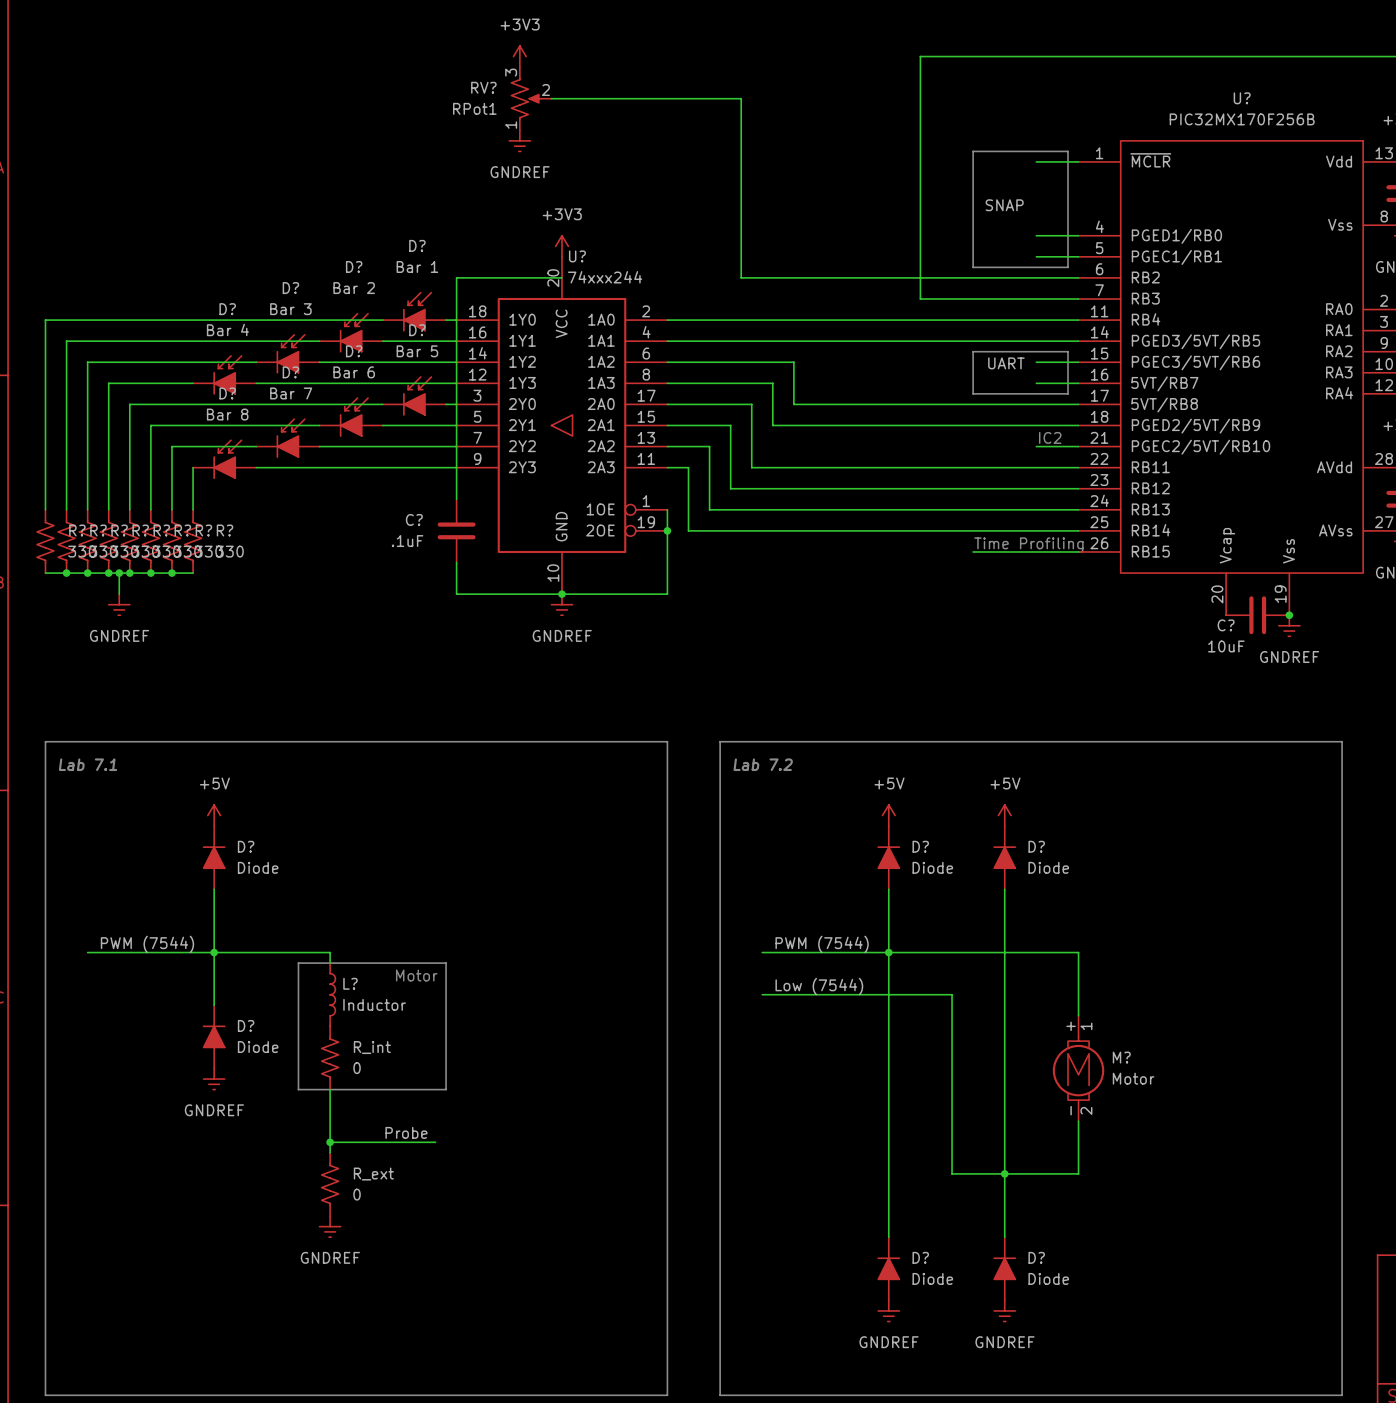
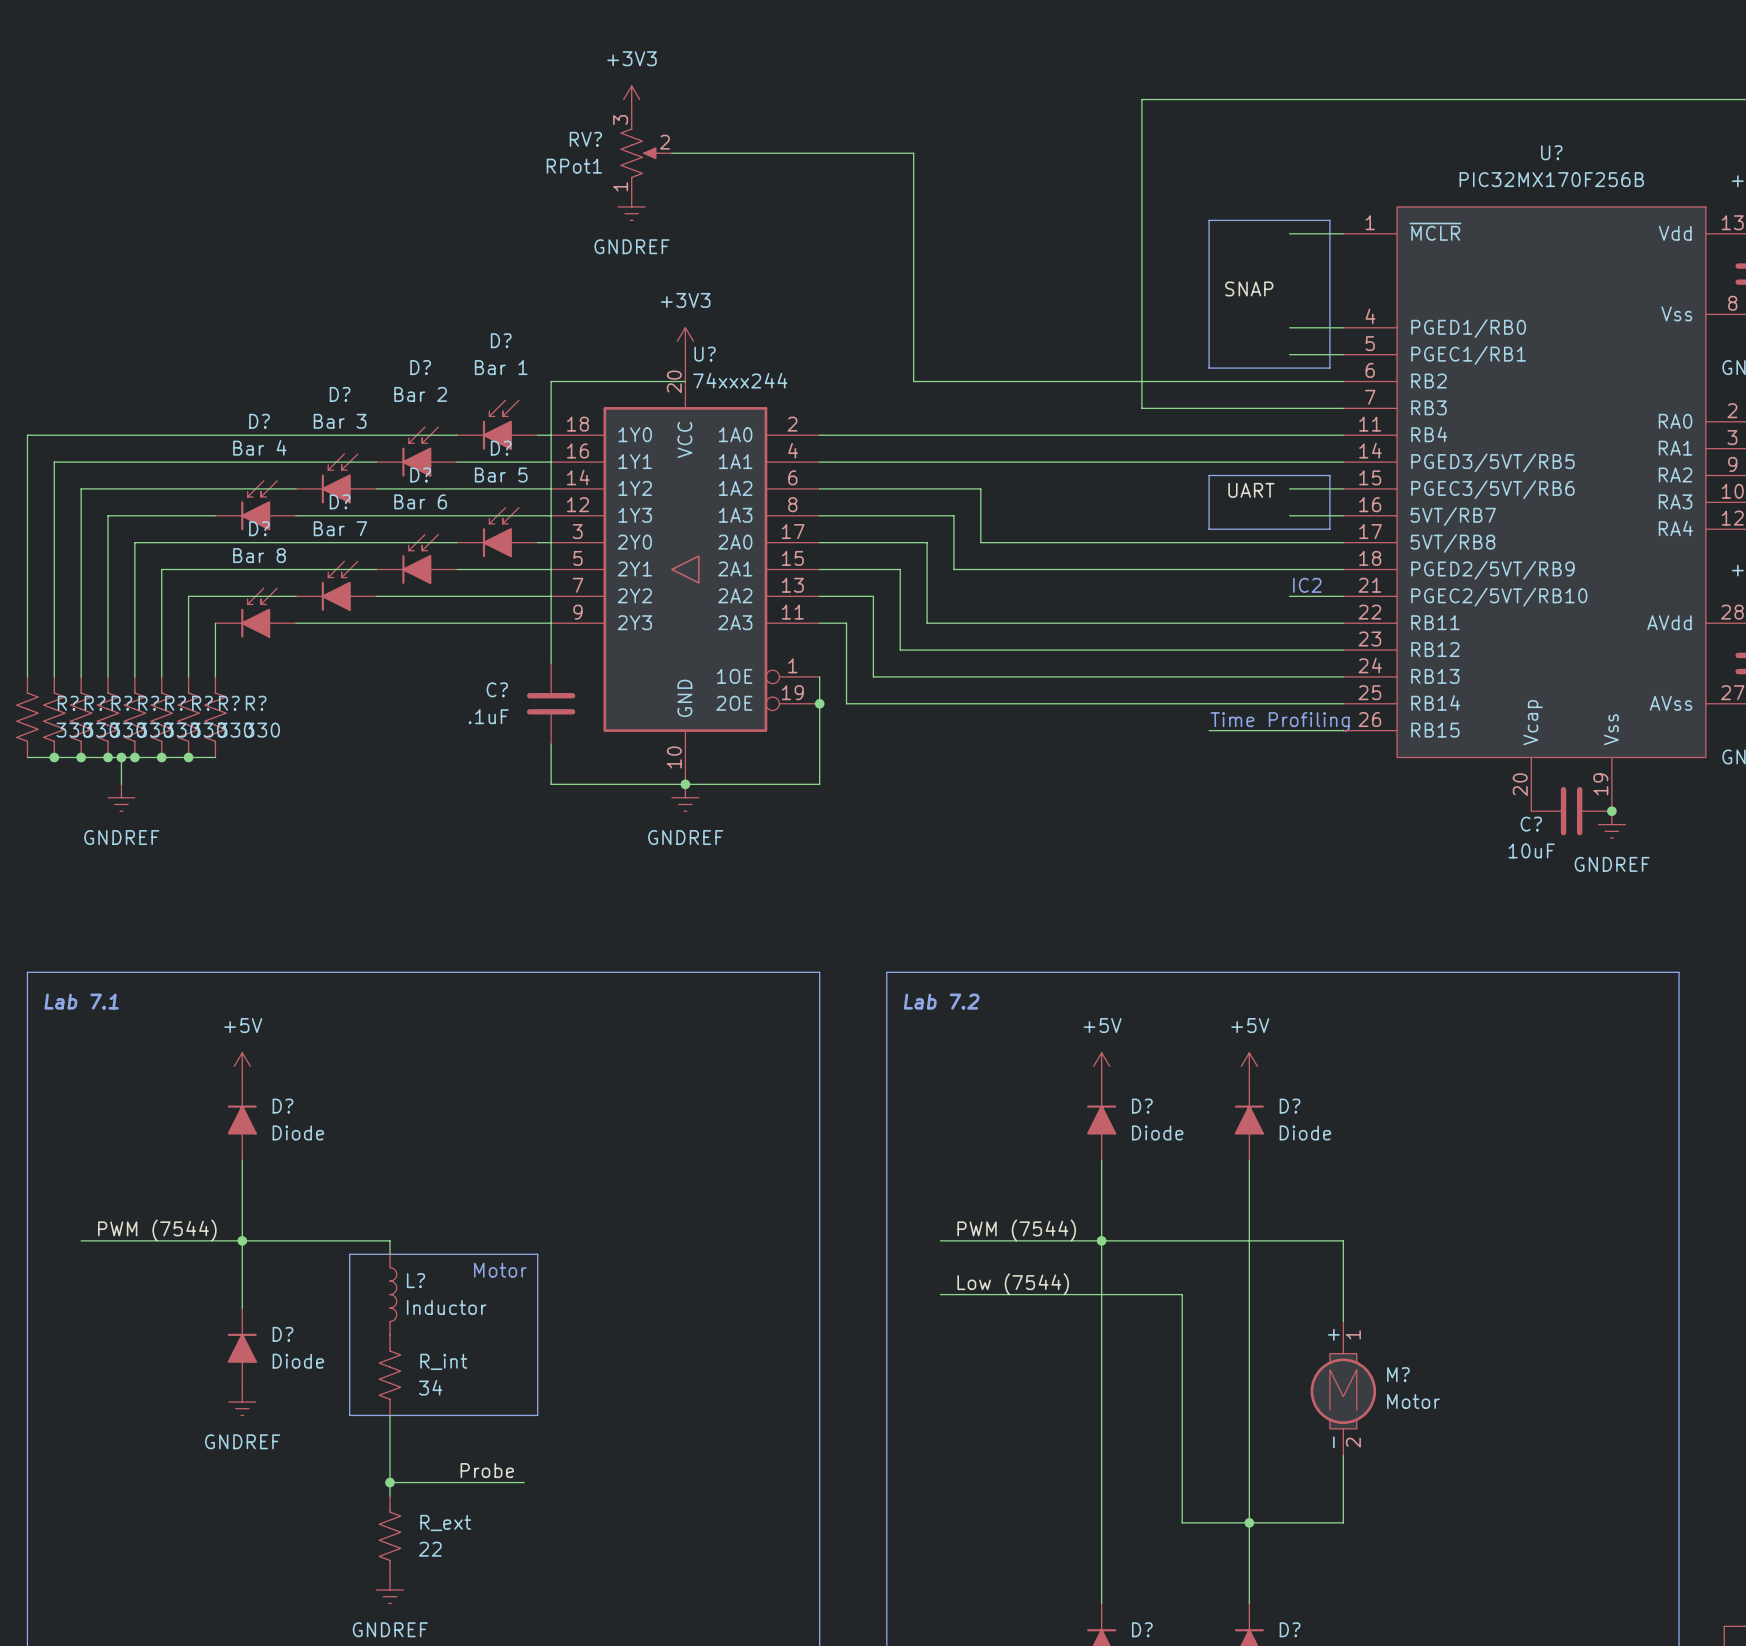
R_int value: 0 (357, 1068) -> 34 (430, 1387)
R_ext value: 0 (357, 1194) -> 22 (430, 1549)

